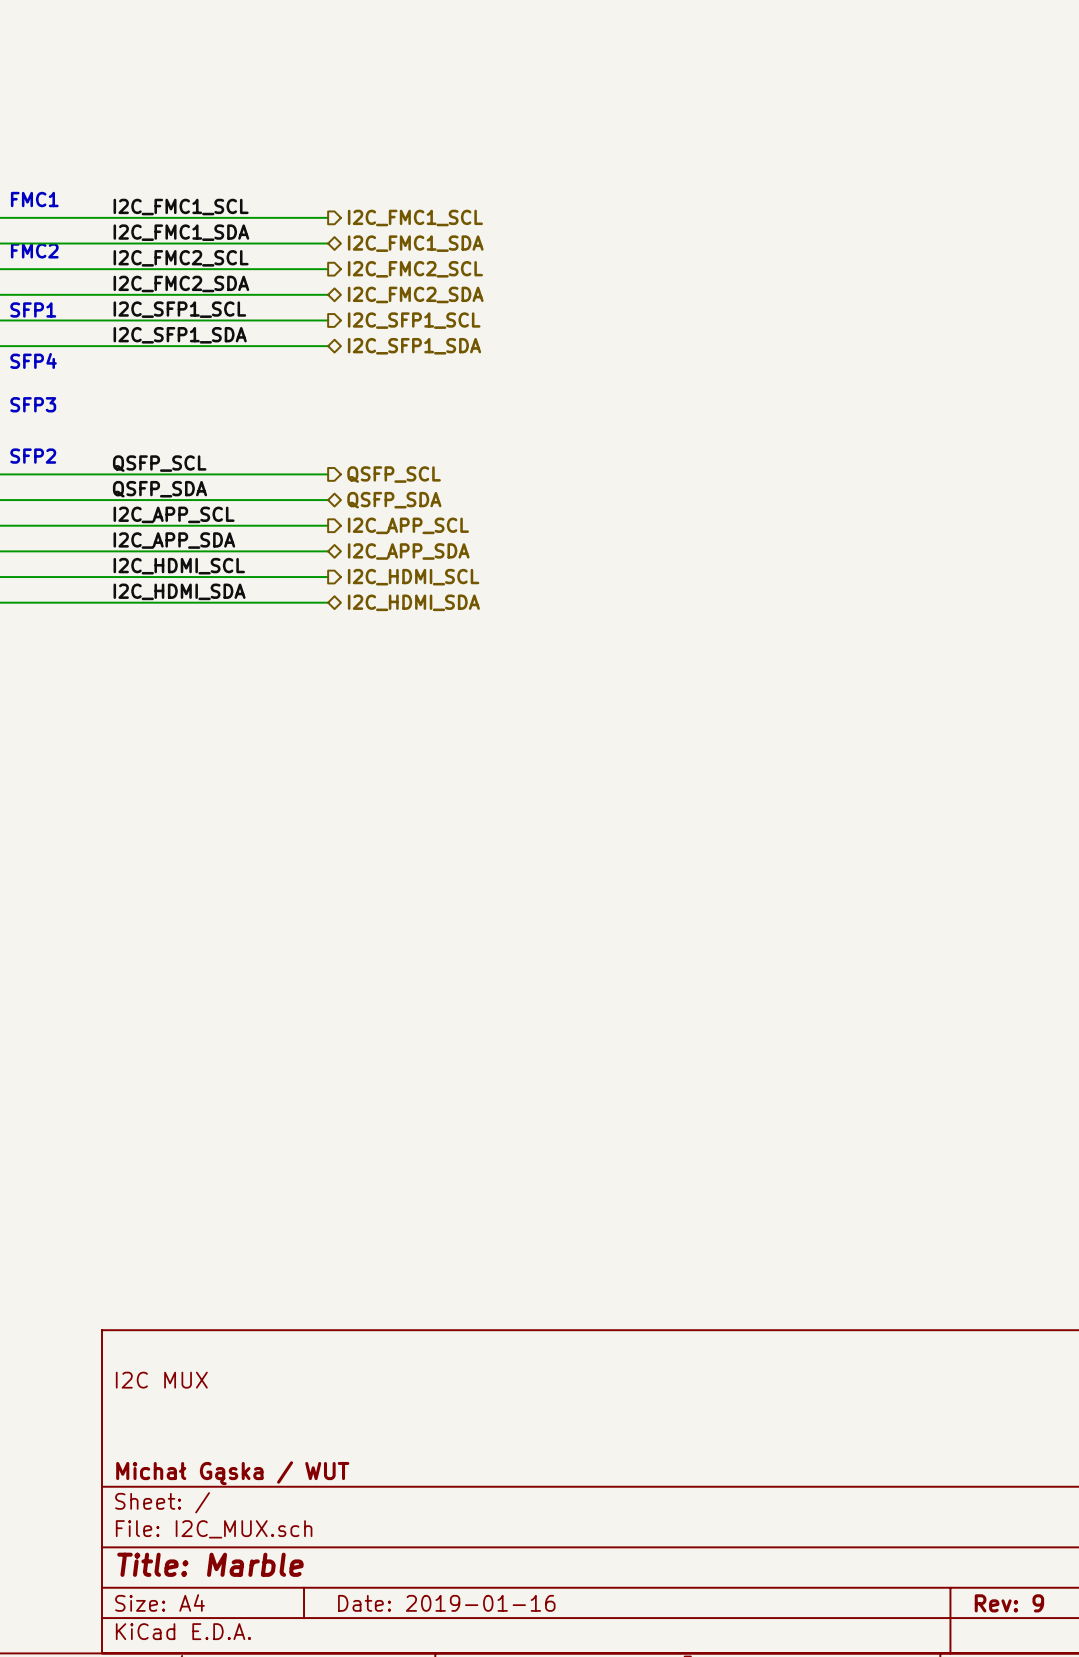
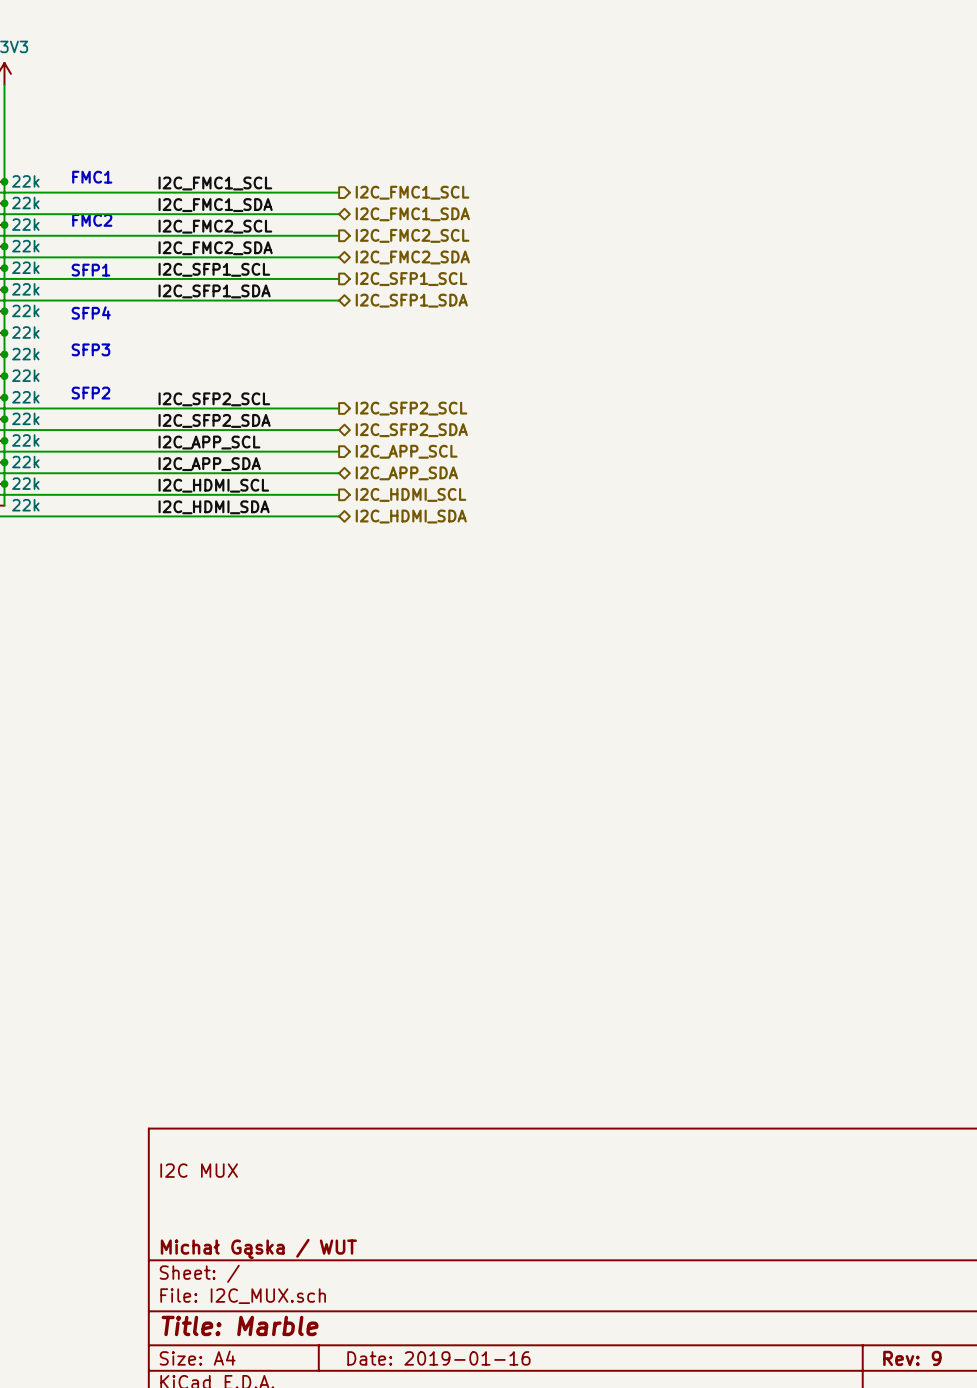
label: QSFP_SCL (159, 463) -> I2C_SFP2_SCL (214, 399)
hierarchical label: QSFP_SCL (394, 474) -> I2C_SFP2_SCL (411, 408)
label: QSFP_SDA (160, 489) -> I2C_SFP2_SDA (214, 420)
hierarchical label: QSFP_SDA (394, 500) -> I2C_SFP2_SDA (411, 430)

